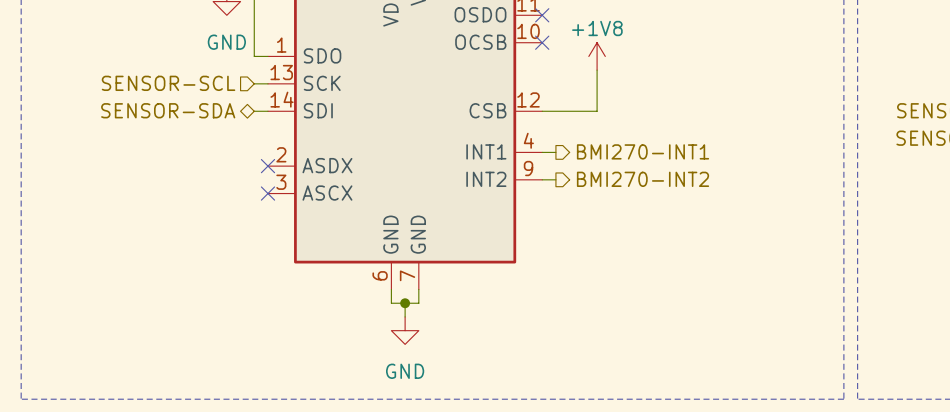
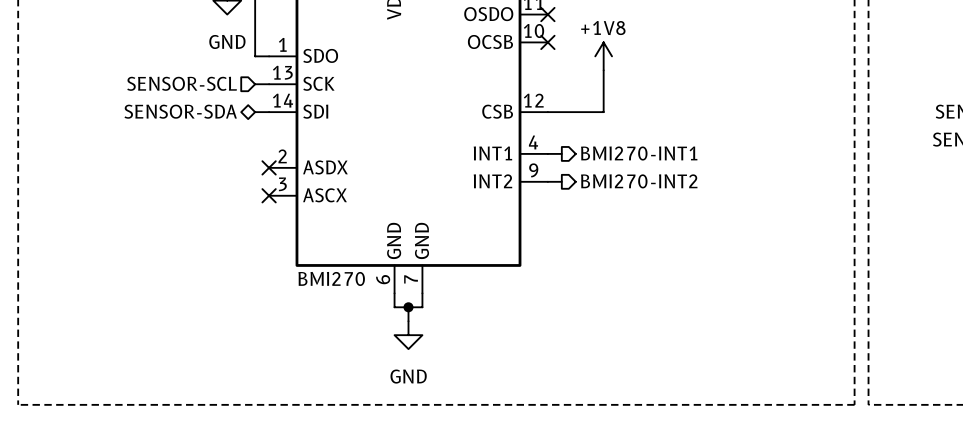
part value: none -> BMI270 (331, 278)

